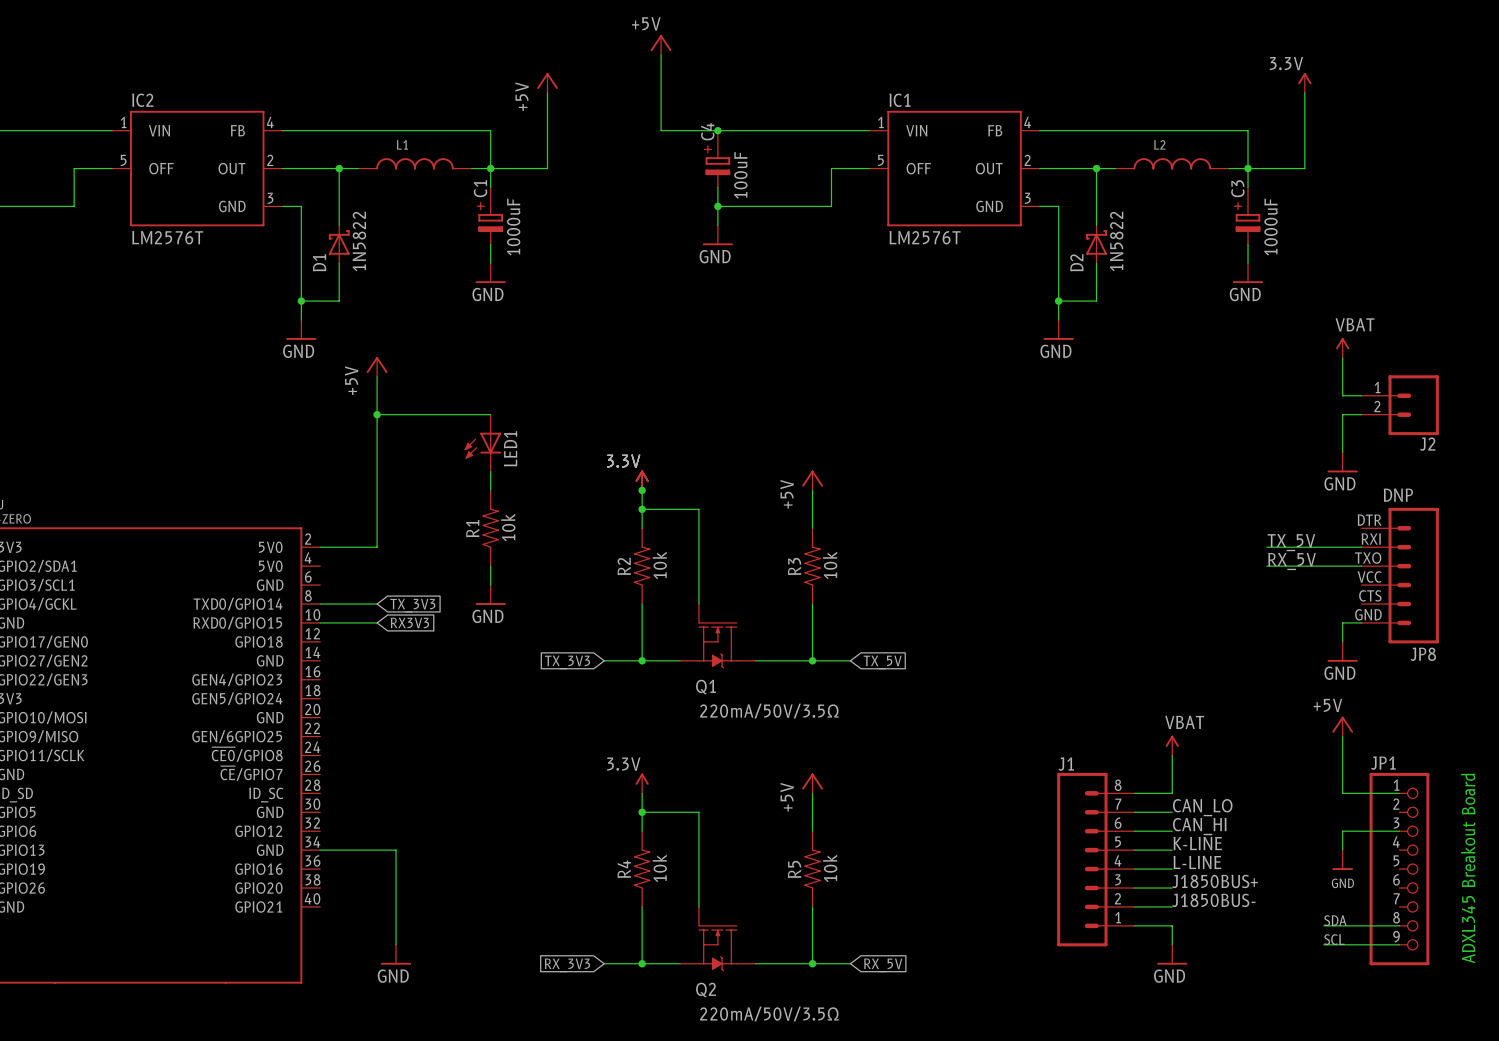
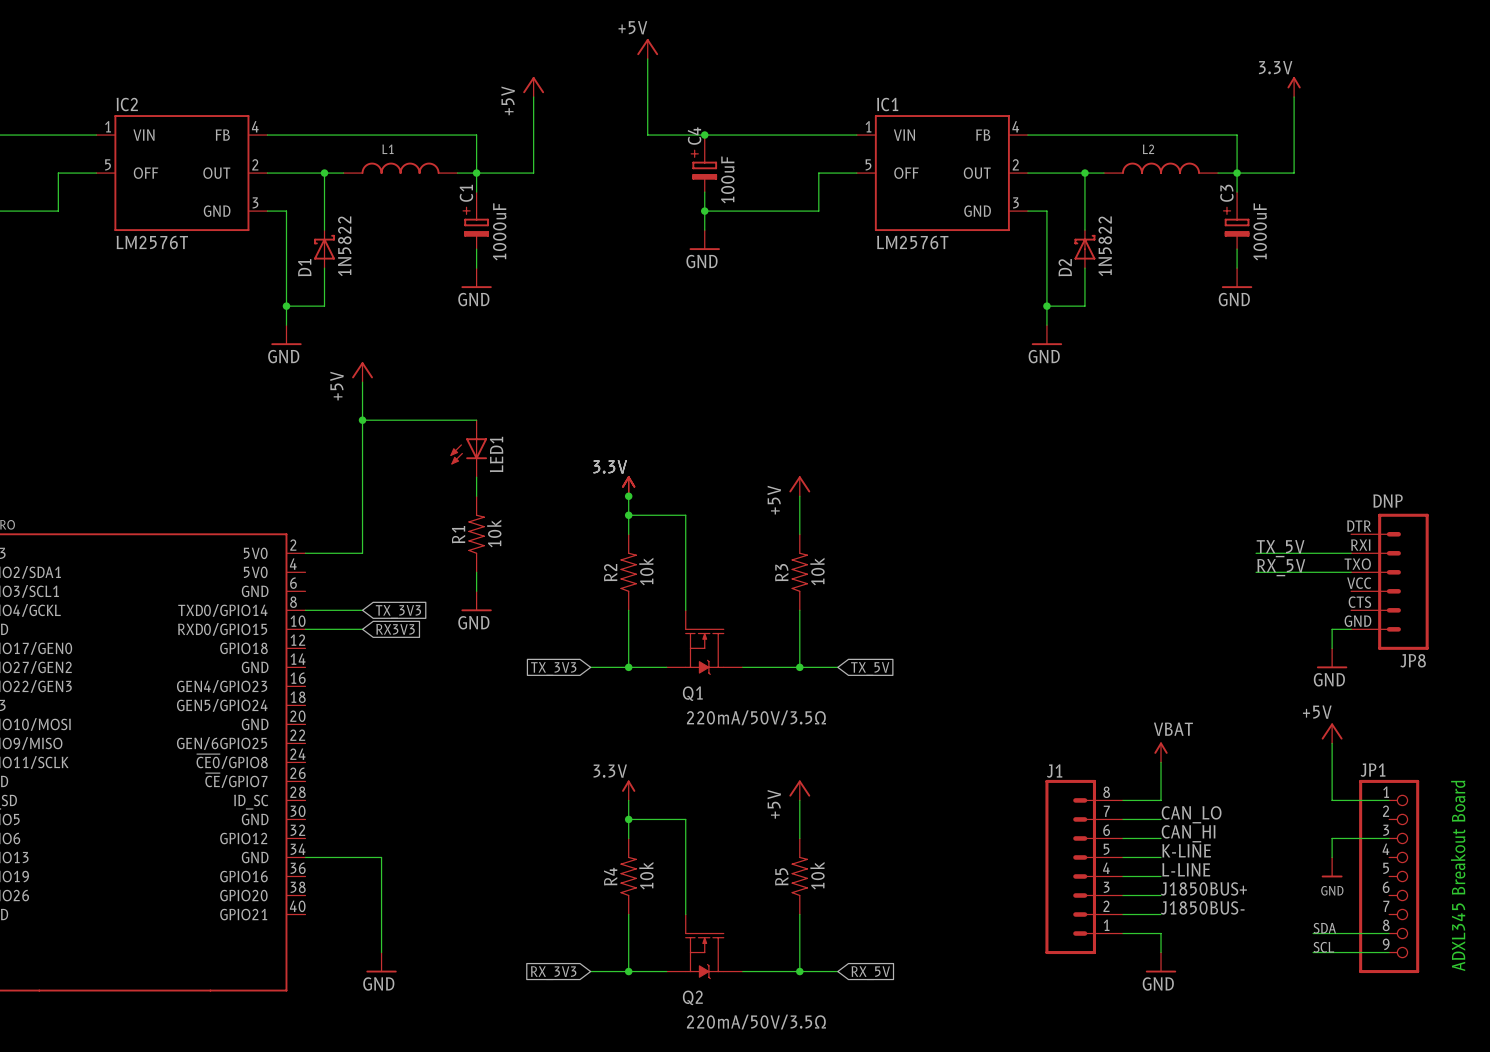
power symbol: VBAT (1342, 347) -> none
wire: (1342, 357) (1342, 395) (1361, 395) -> none
J2: (1400, 405) -> none
wire: (1361, 414) (1342, 414) (1342, 452) -> none
power symbol: GND (1342, 462) -> none

